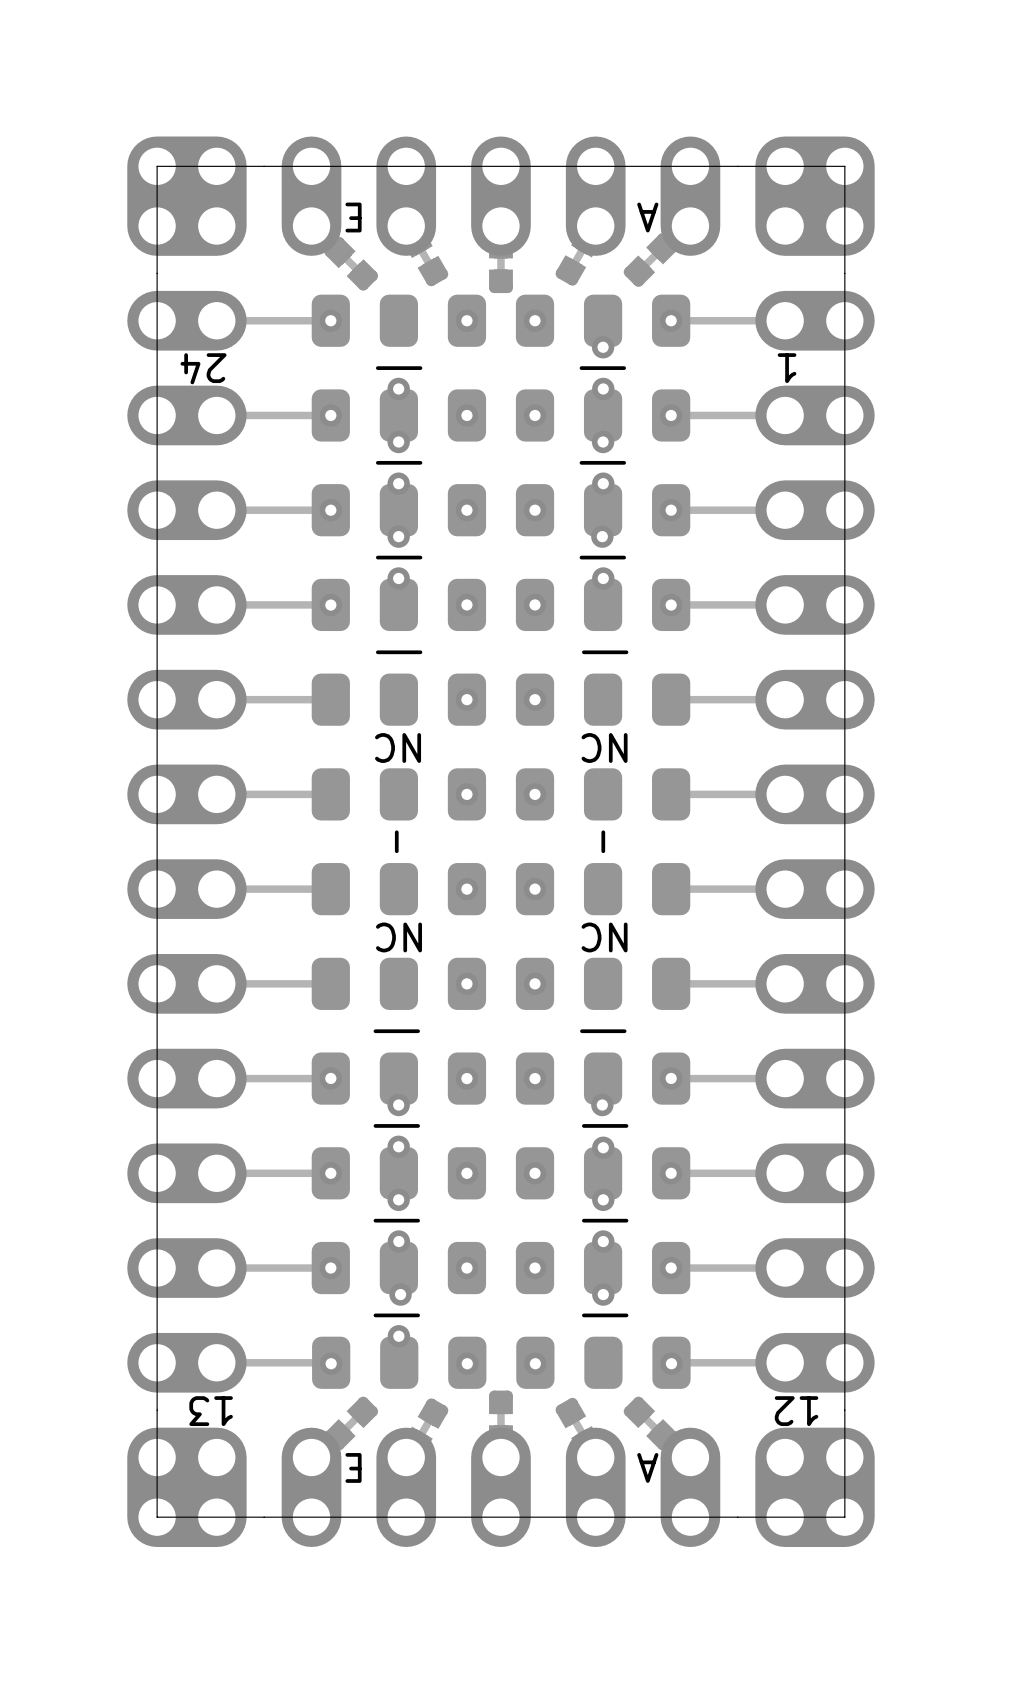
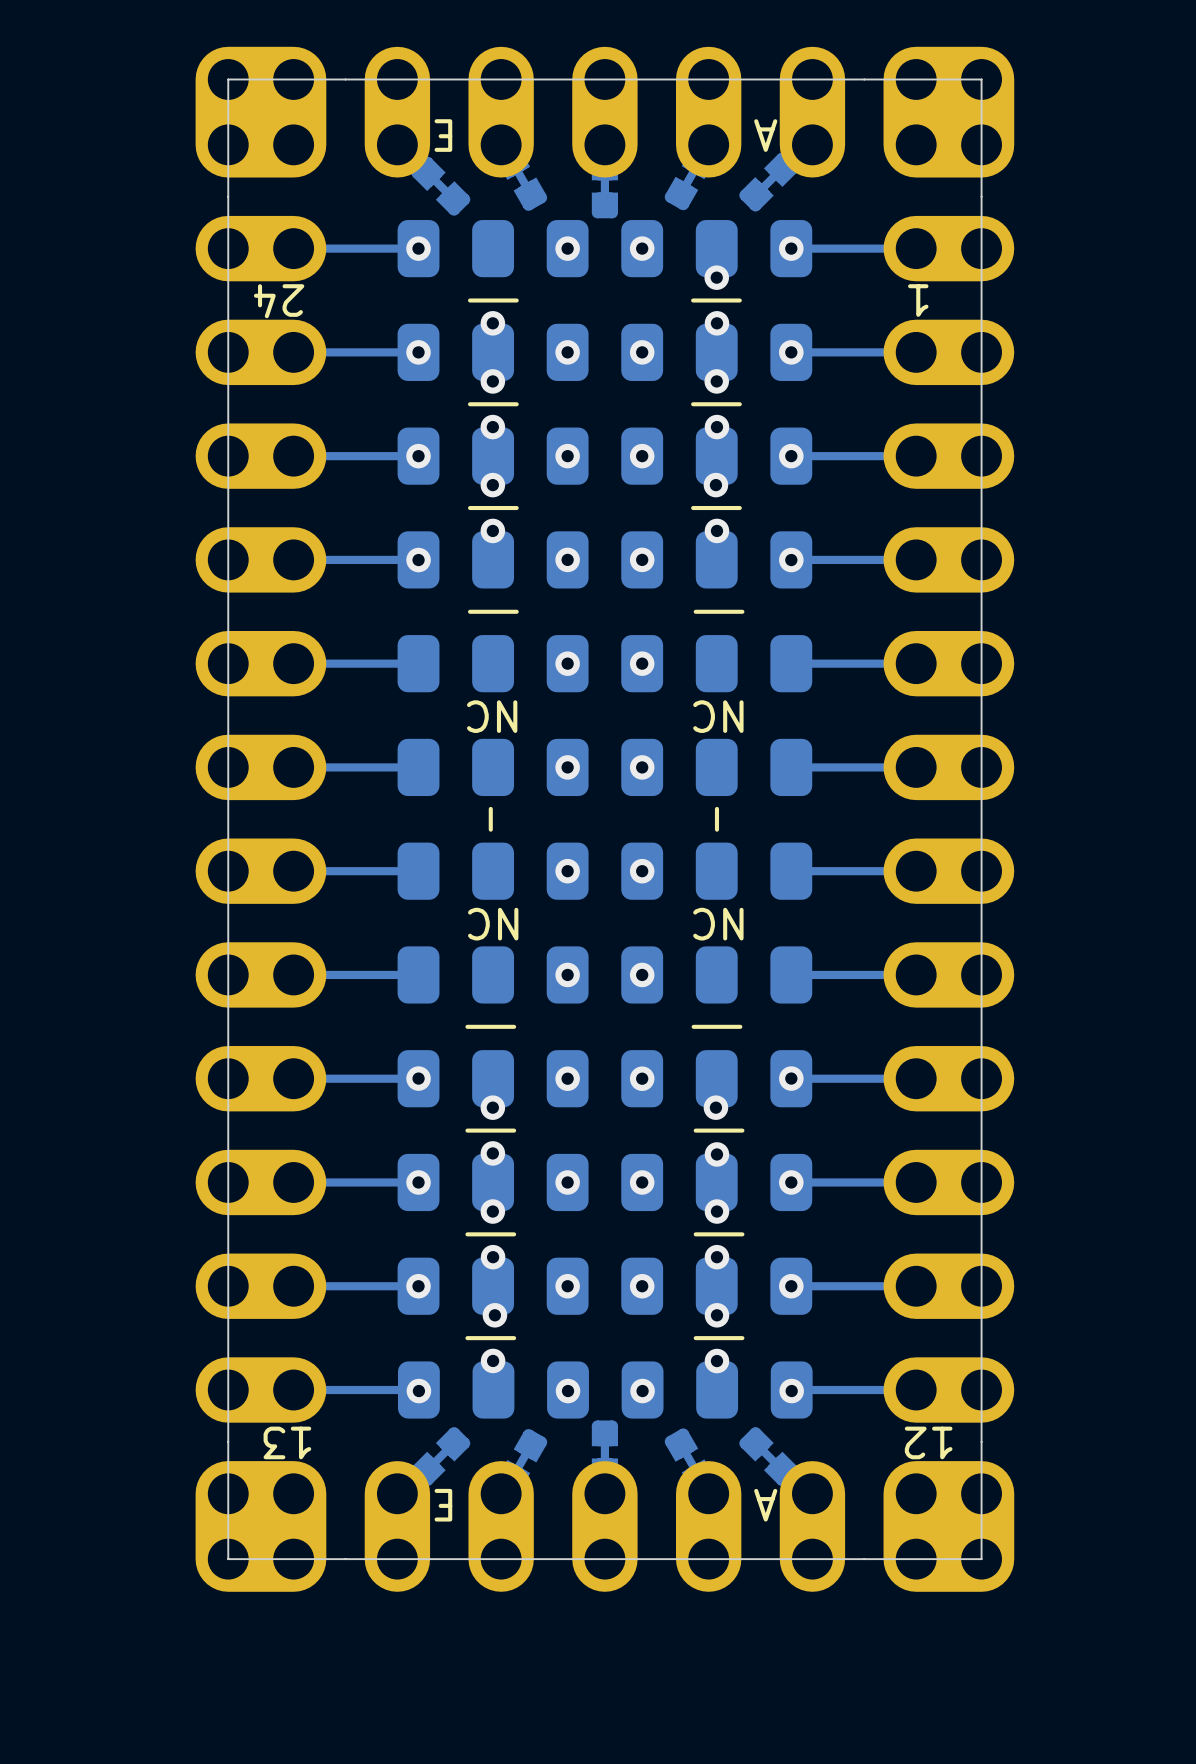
via: none -> (716, 1361)

